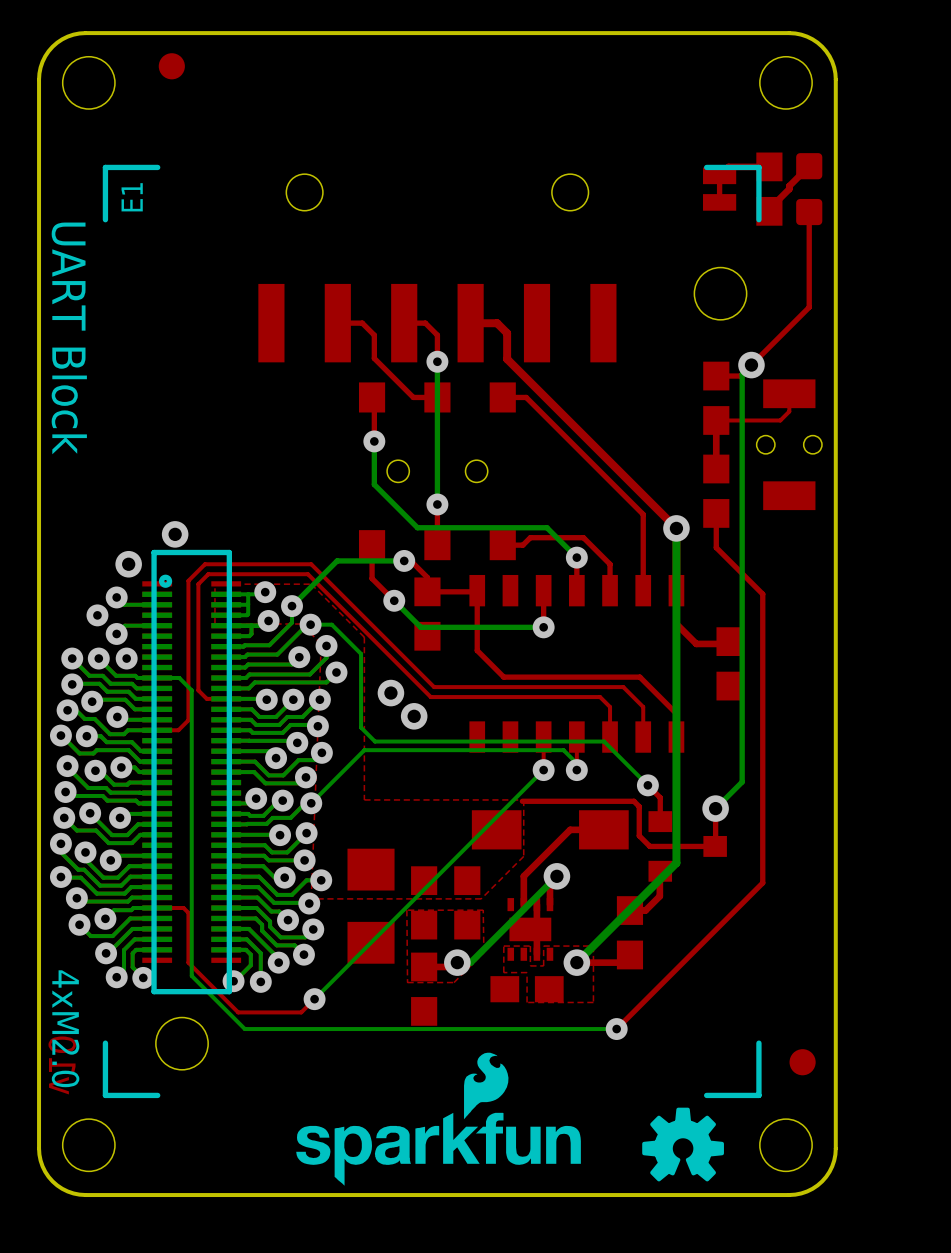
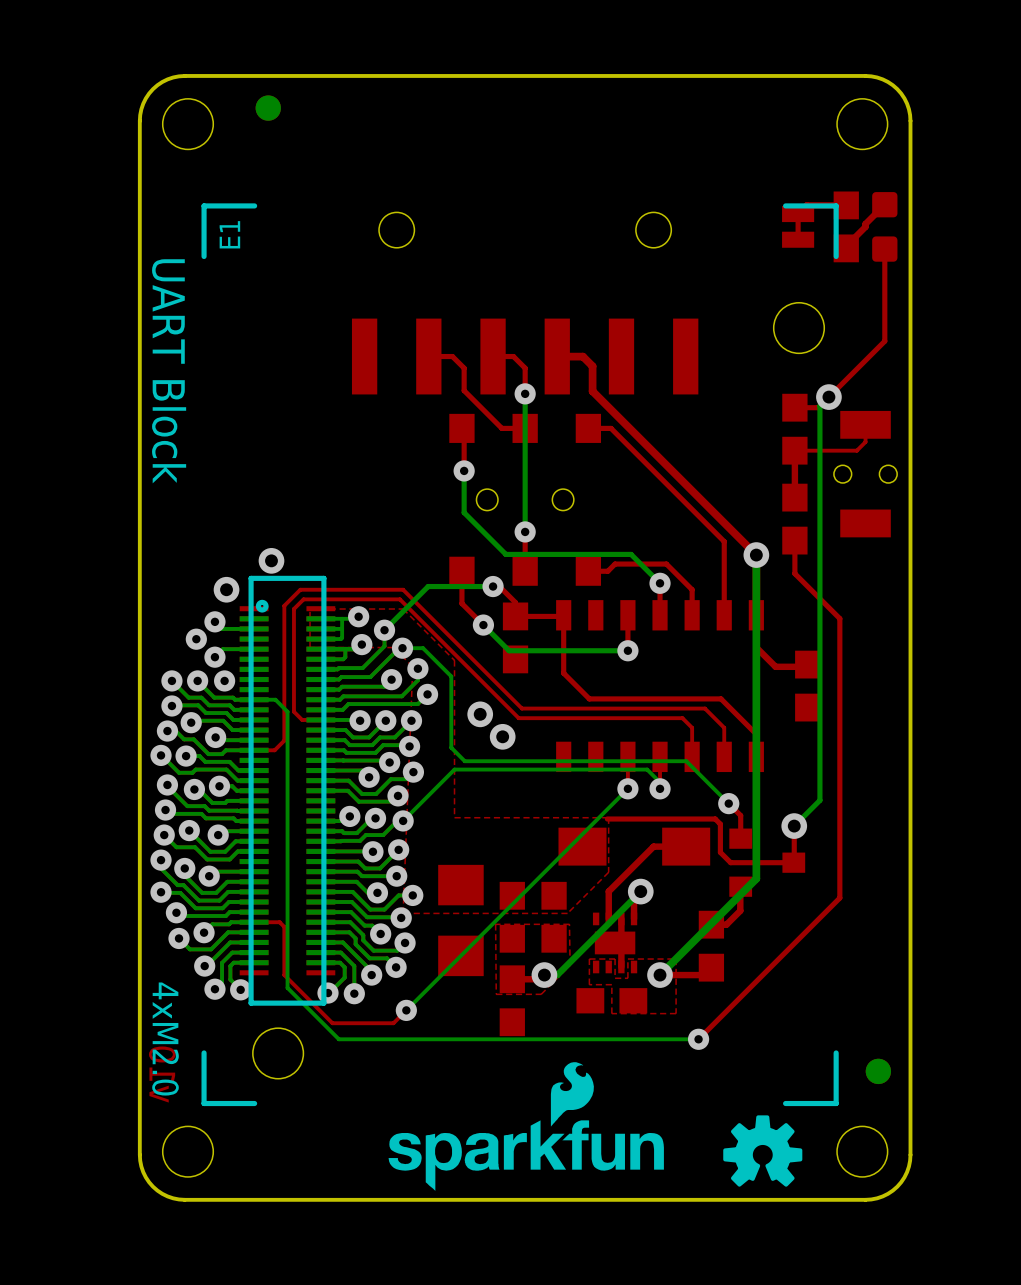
part: none -> (268, 108)
part: none -> (878, 1071)

